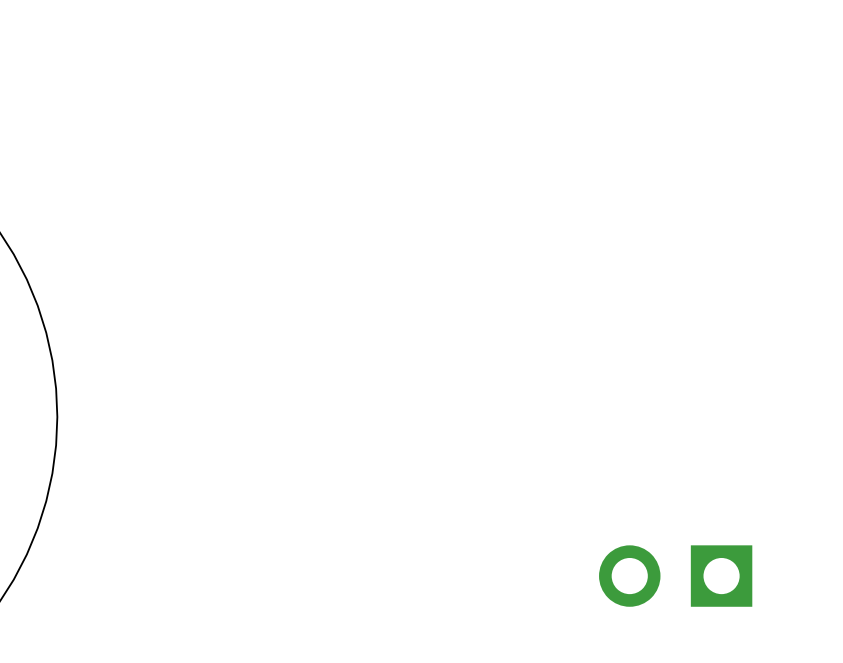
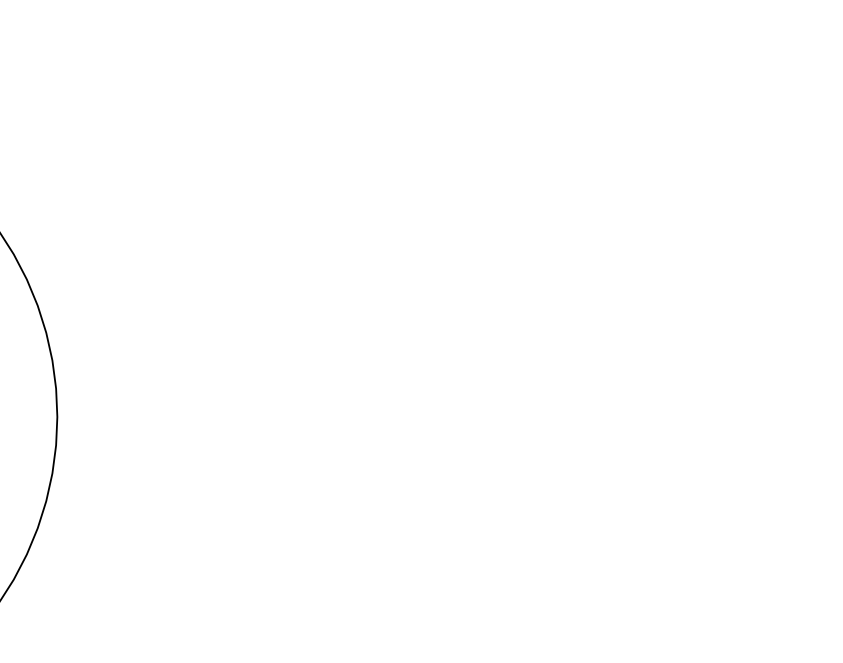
part: (675, 576) -> none

